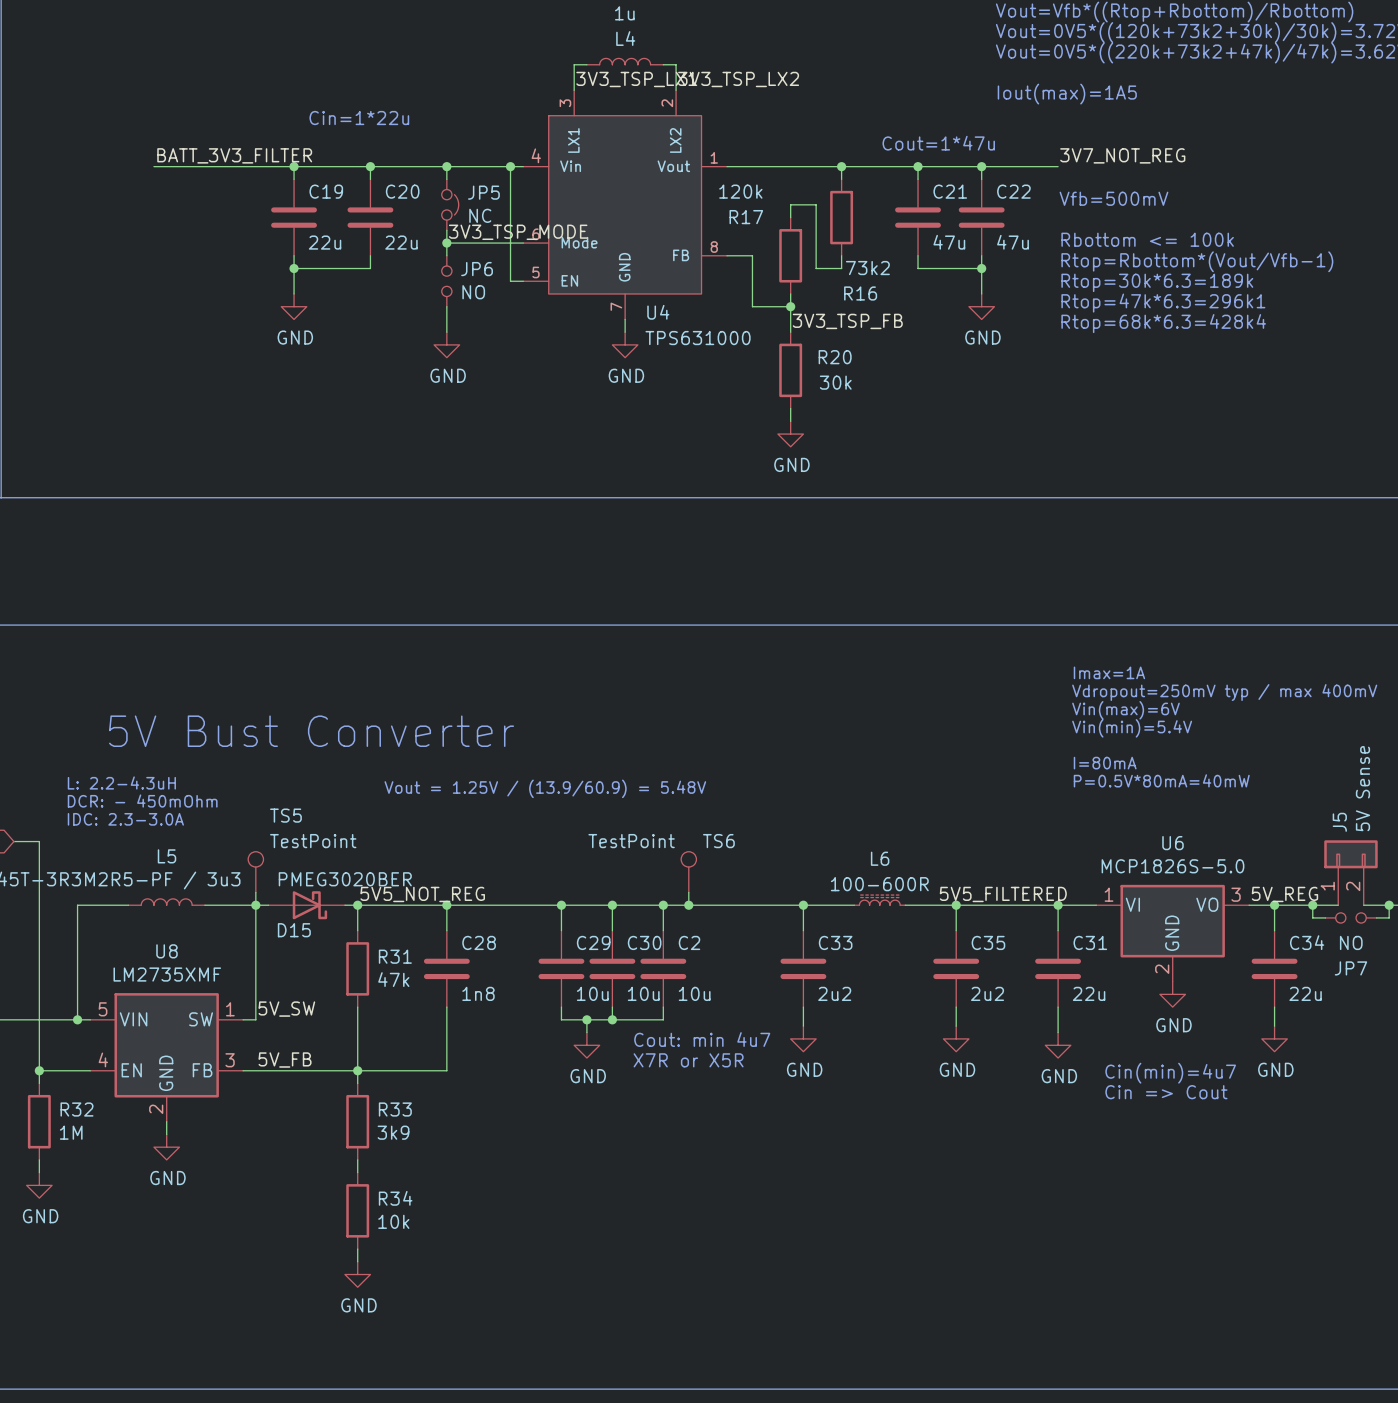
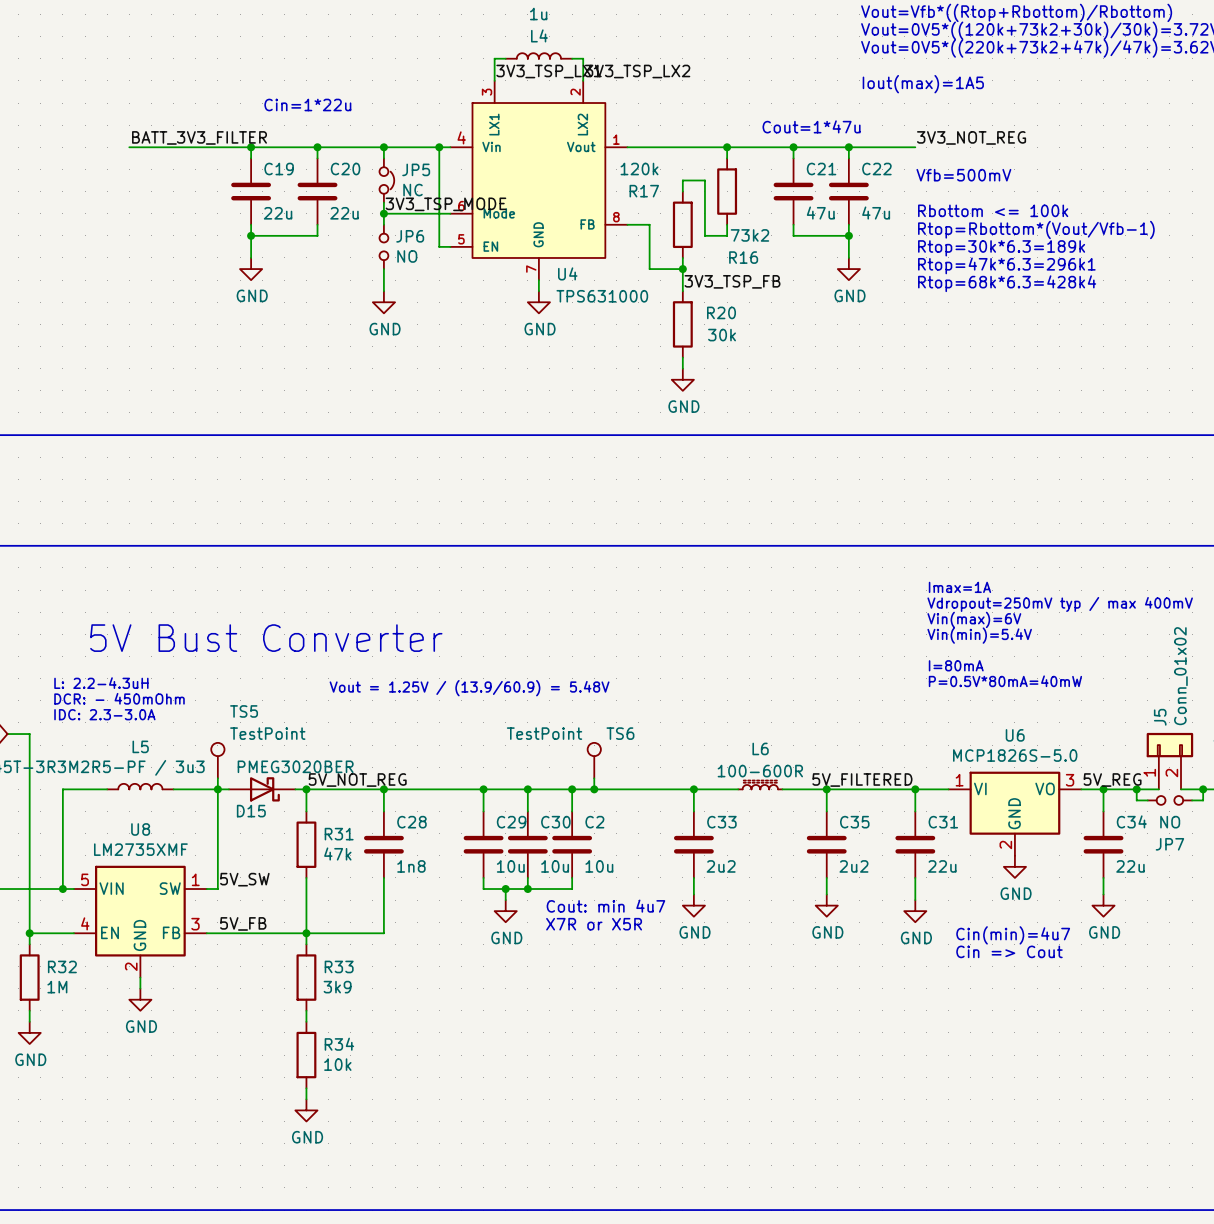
label: 3V7_NOT_REG (1122, 155) -> 3V3_NOT_REG (971, 137)
J5 value: 5V Sense (1362, 788) -> Conn_01x02 (1180, 676)
label: 5V5_NOT_REG (422, 894) -> 5V_NOT_REG (357, 780)
label: 5V5_FILTERED (1003, 894) -> 5V_FILTERED (862, 780)

